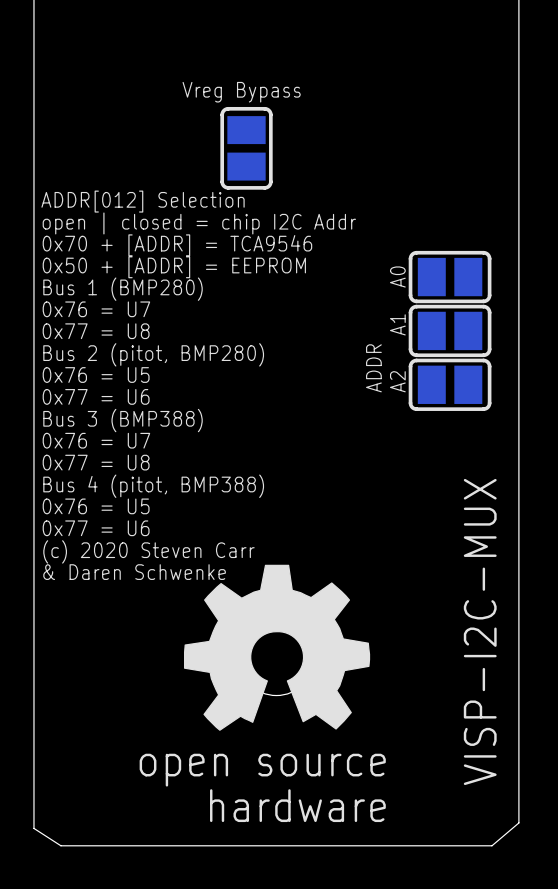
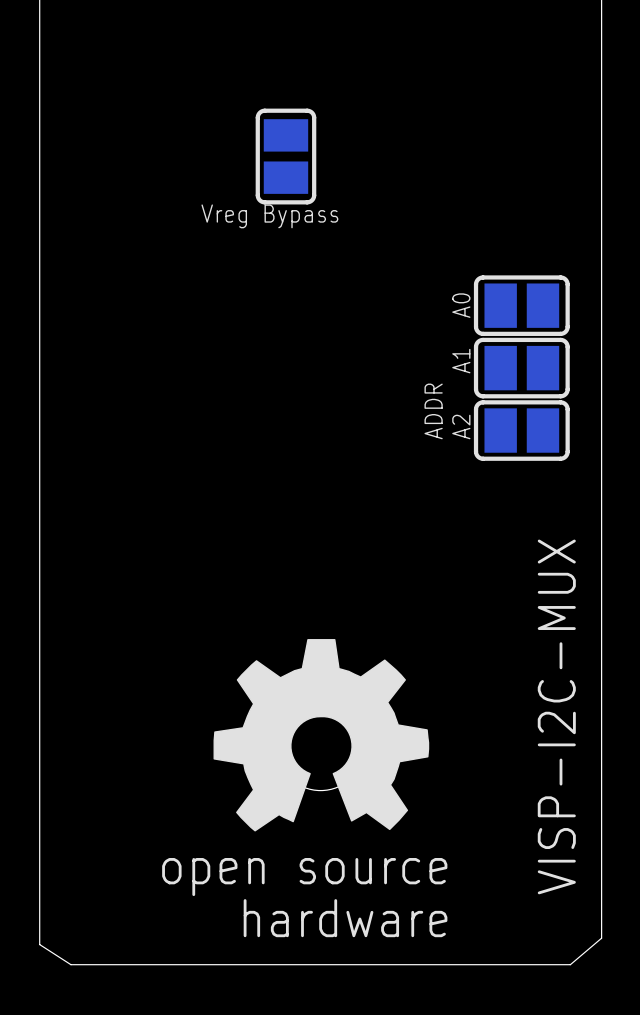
text position: Vreg Bypass (241, 92) -> Vreg Bypass (269, 216)
text: ADDR[012] Selection (143, 201) -> none
text: open | closed = chip I2C Addr (199, 223) -> none
text: 0x70 + [ADDR] = TCA9546 (177, 245) -> none
text: 0x50 + [ADDR] = EEPROM (174, 267) -> none
text: Bus 1 (BMP280) (123, 289) -> none
text: 0x76 = U7 (96, 309) -> none
text: 0x77 = U8 (96, 331) -> none
text: Bus 2 (pitot, BMP280) (153, 354) -> none
text: 0x76 = U5 (96, 375) -> none
text: 0x77 = U6 (96, 396) -> none
text: Bus 3 (BMP388) (123, 420) -> none
text: 0x76 = U7 (96, 440) -> none
text: 0x77 = U8 (96, 462) -> none
text: Bus 4 (pitot, BMP388) (153, 486) -> none
text: 0x76 = U5 (96, 506) -> none
text: 0x77 = U6 (96, 528) -> none
text: (c) 2020 Steven Carr (148, 551) -> none
text: & Daren Schwenke (134, 572) -> none

